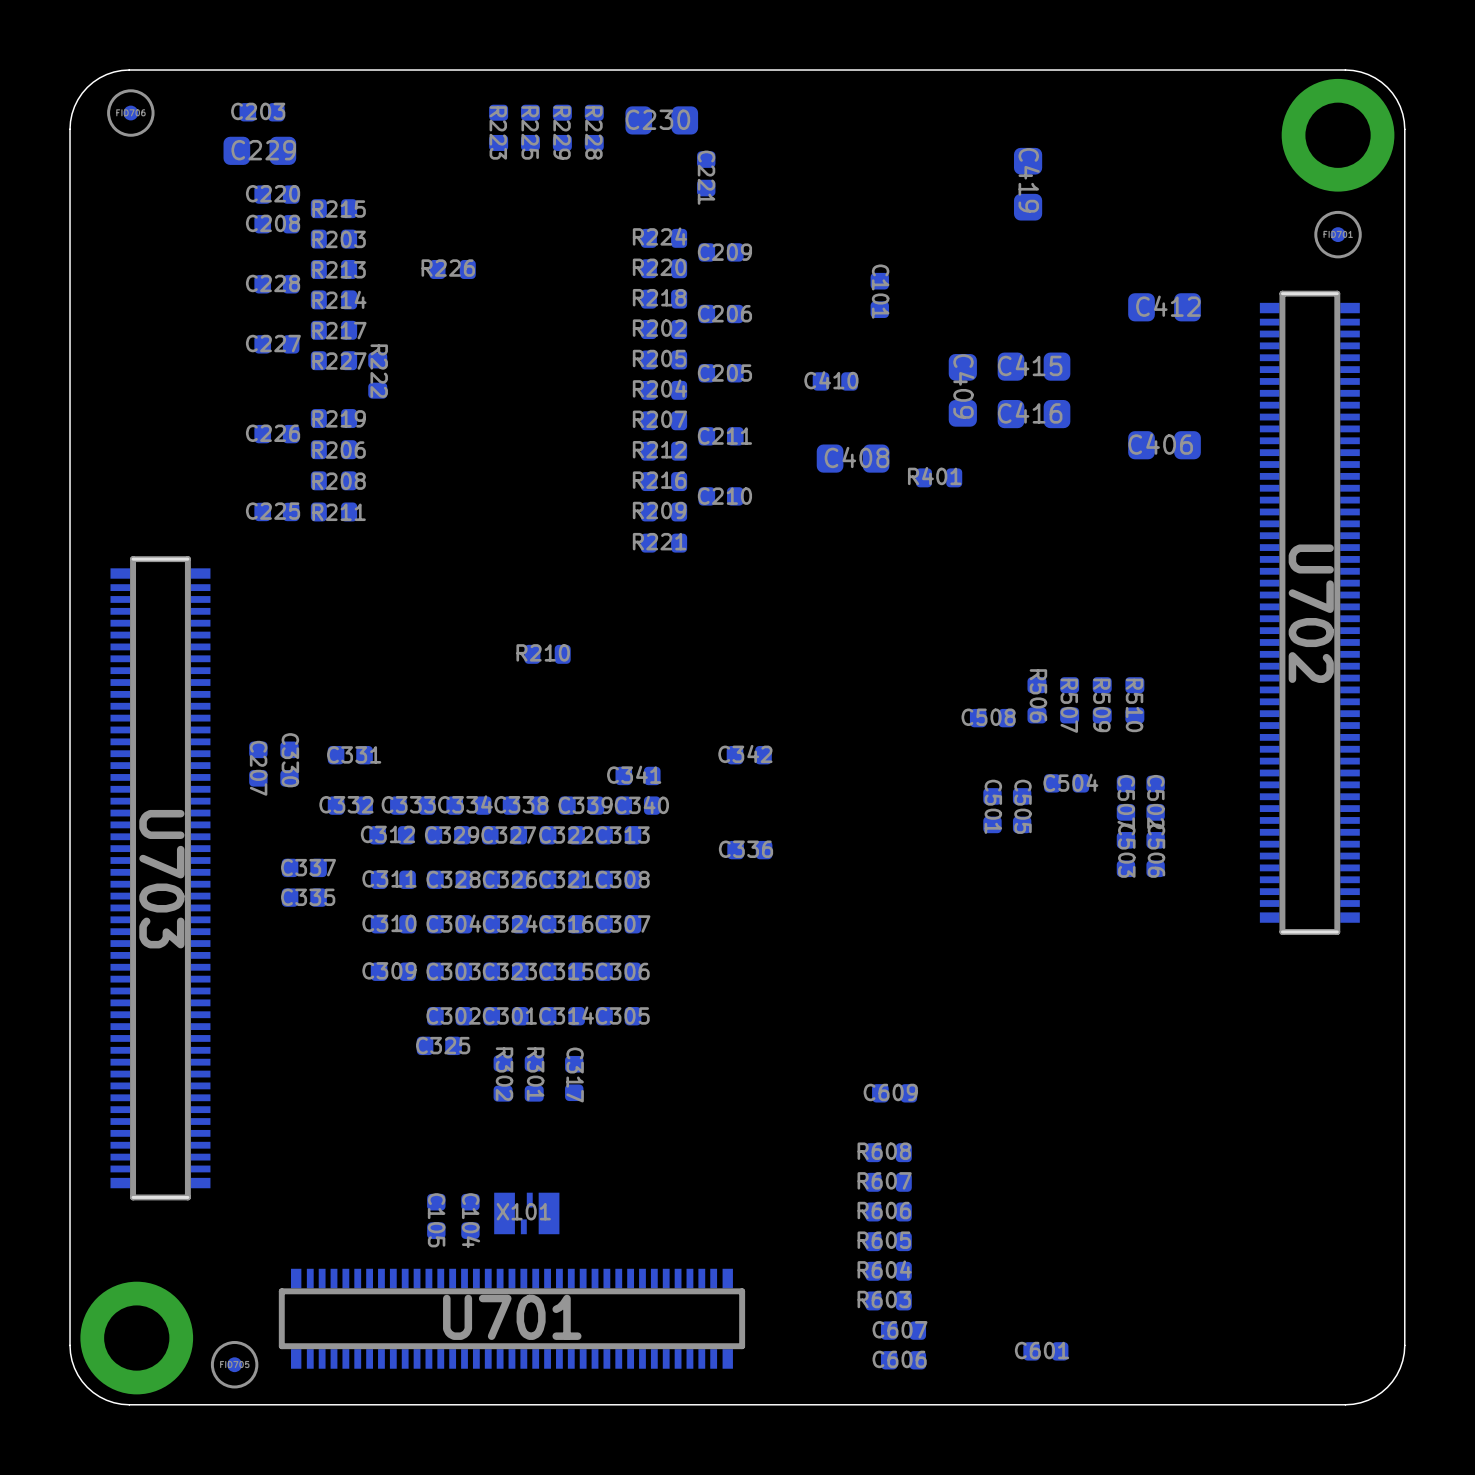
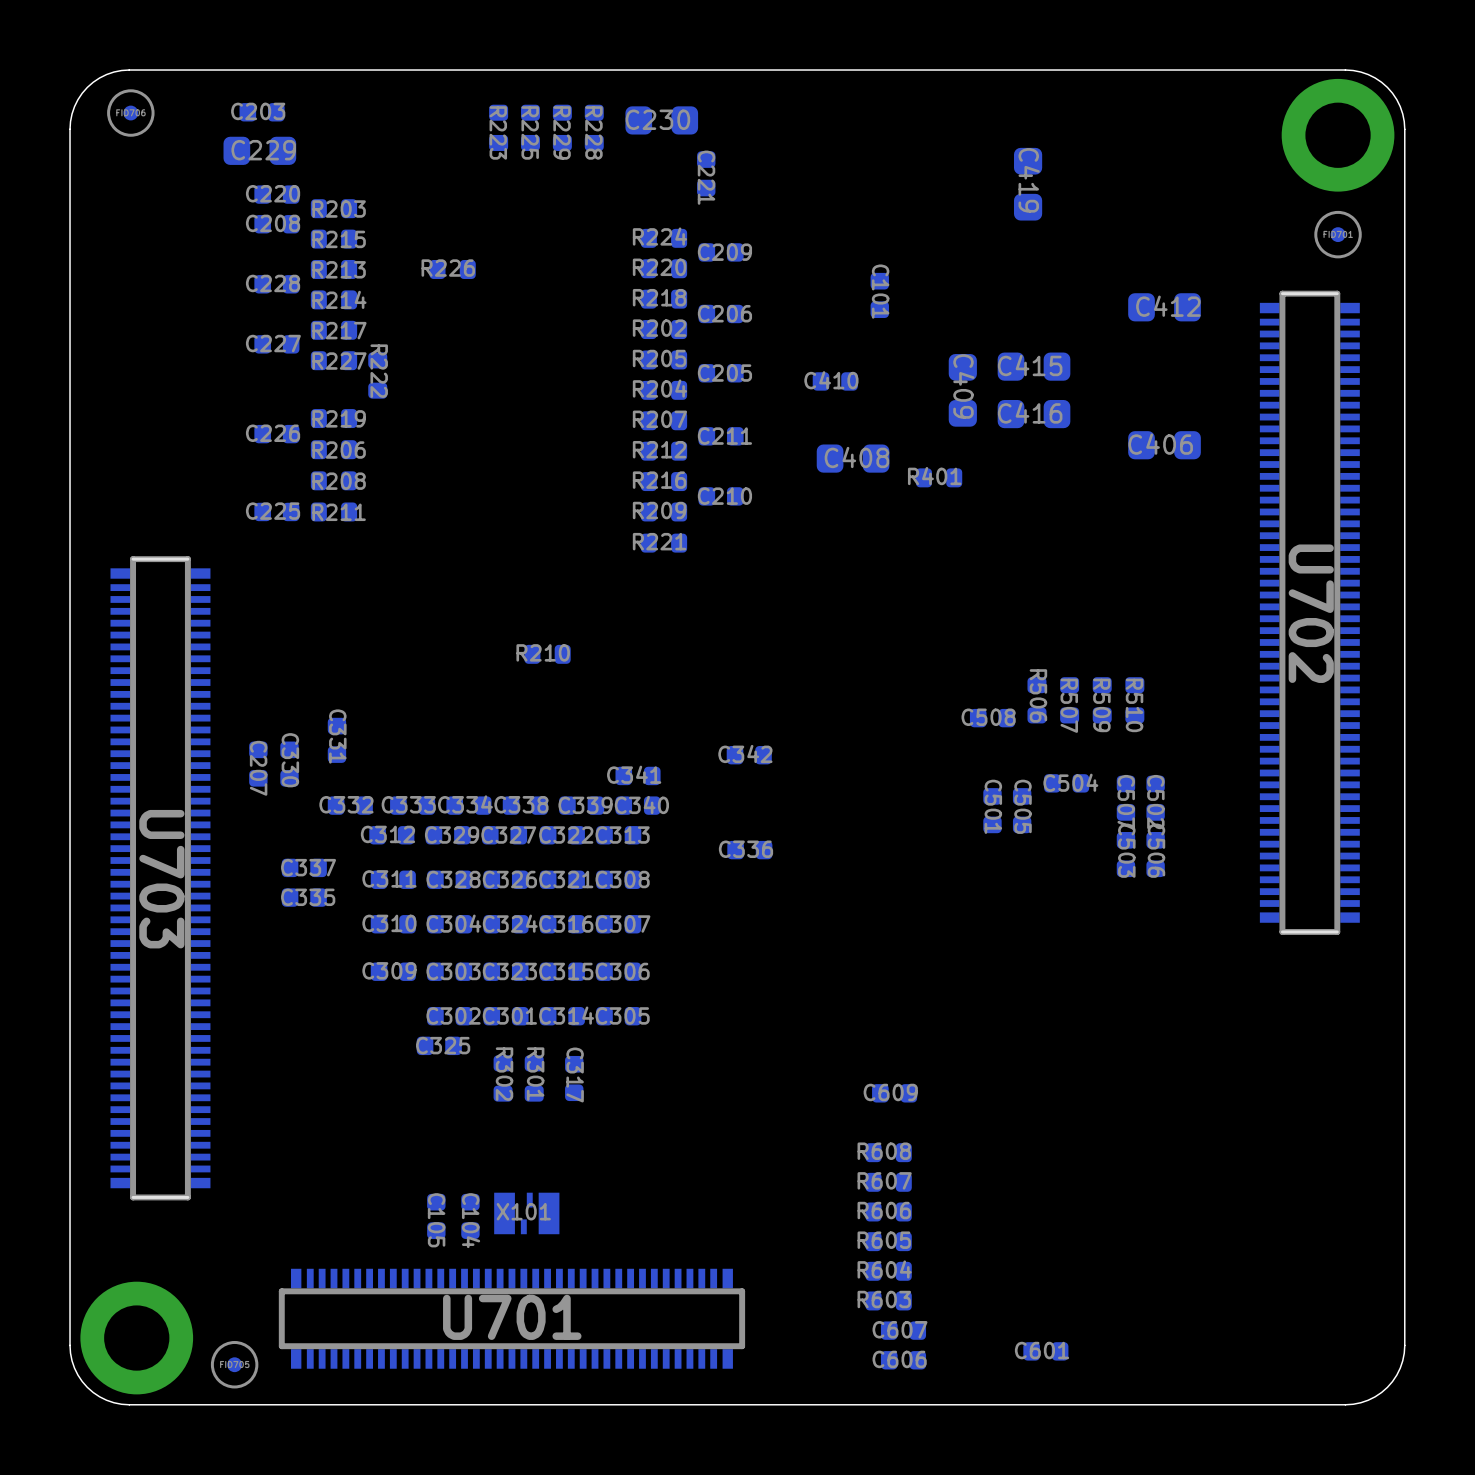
R215 name: R215 (339, 209) -> R203 (339, 209)
R203 name: R203 (339, 239) -> R215 (339, 239)
C331 rotation: 0° (350, 755) -> 90° clockwise (336, 740)

